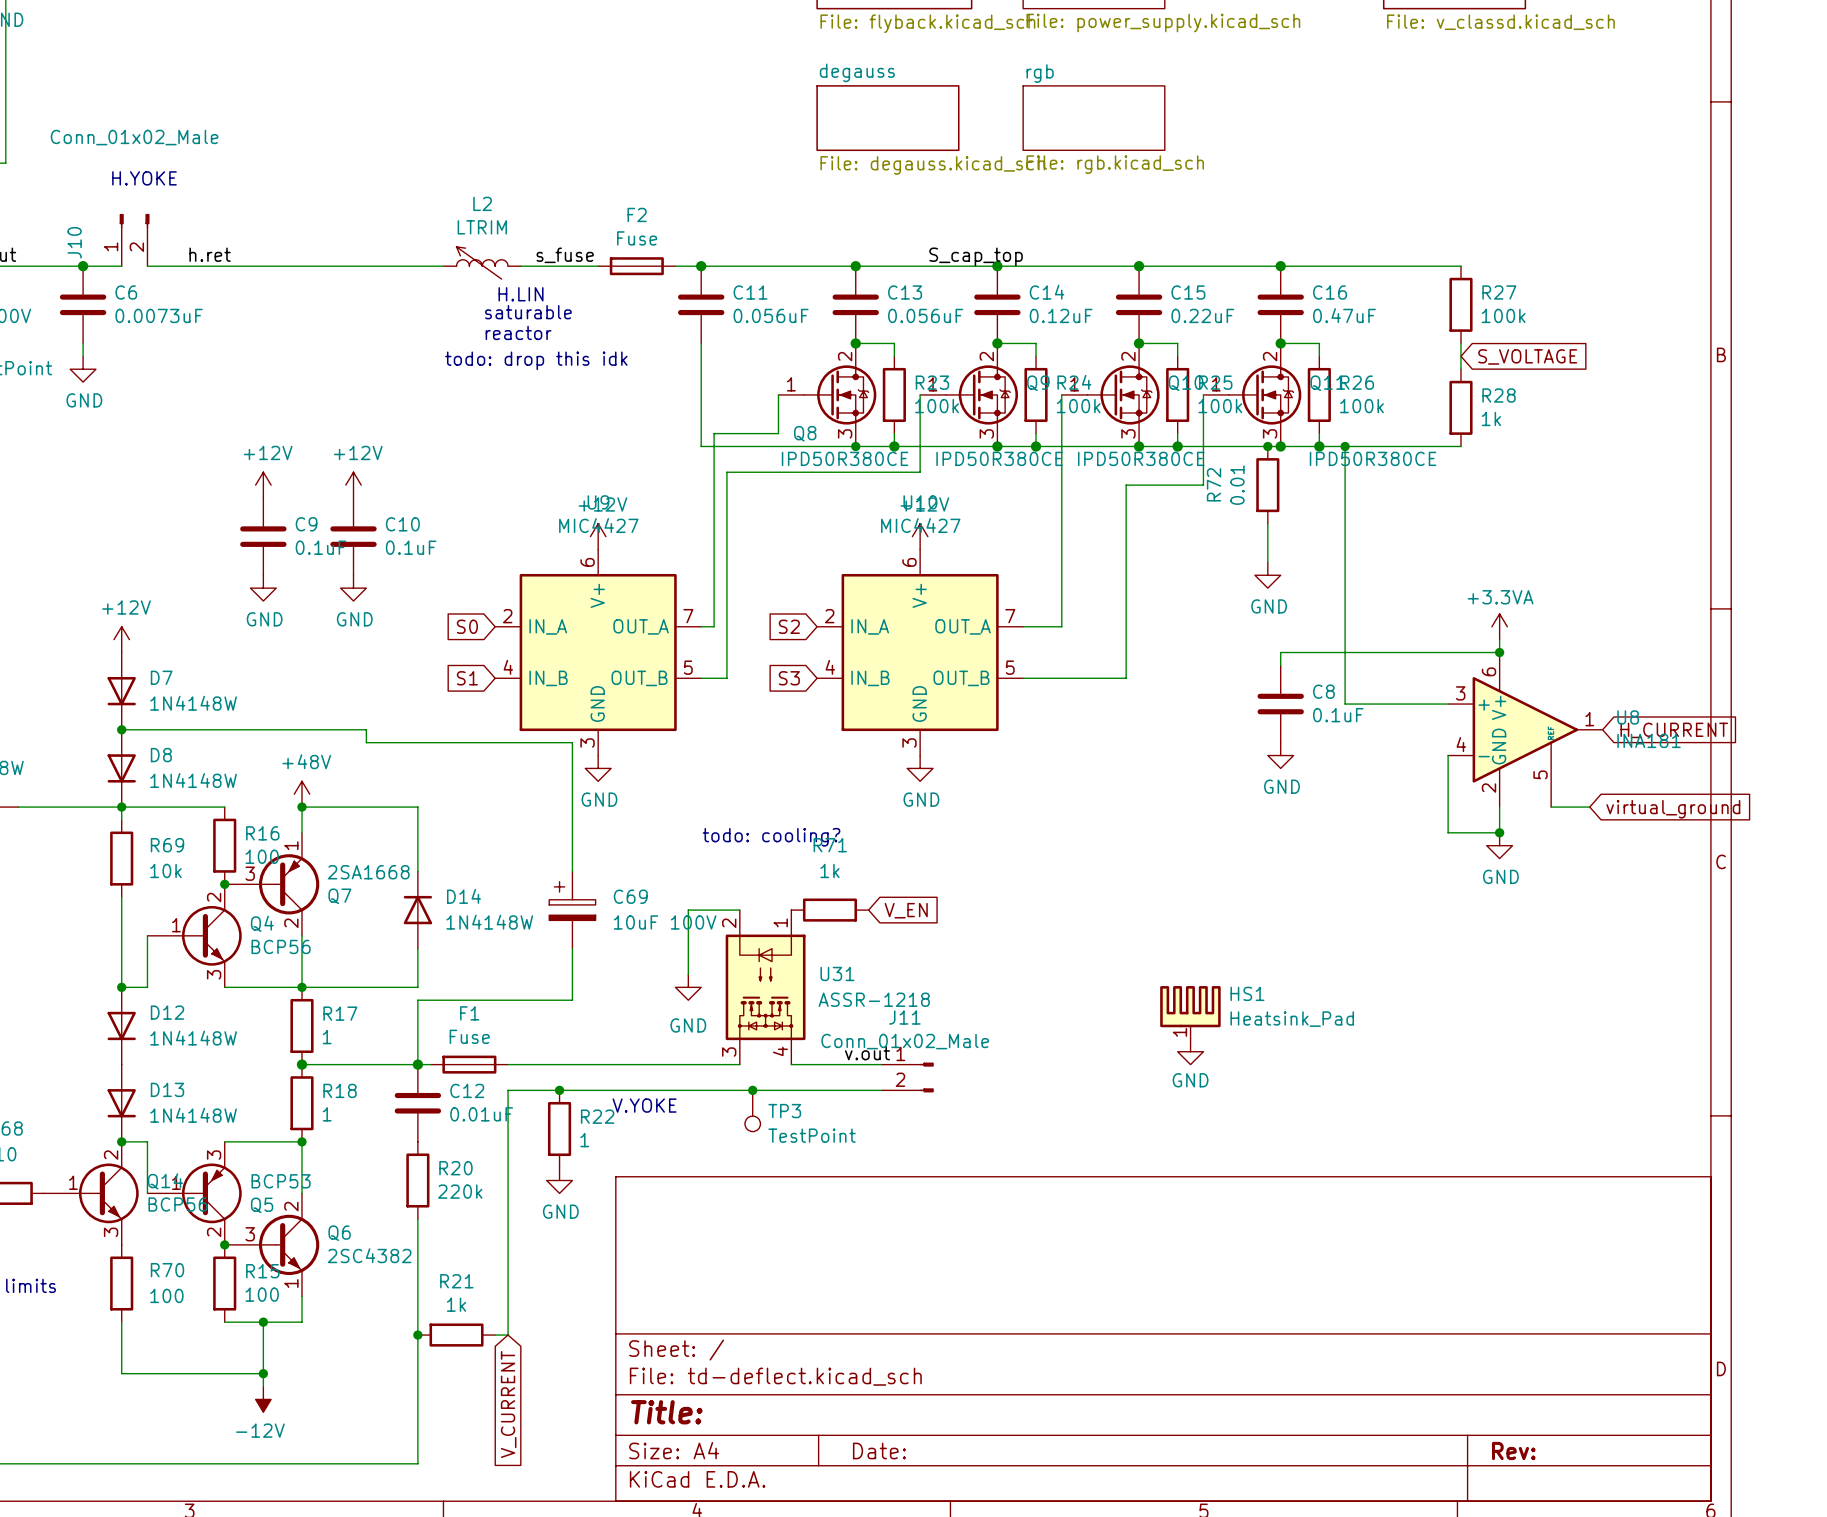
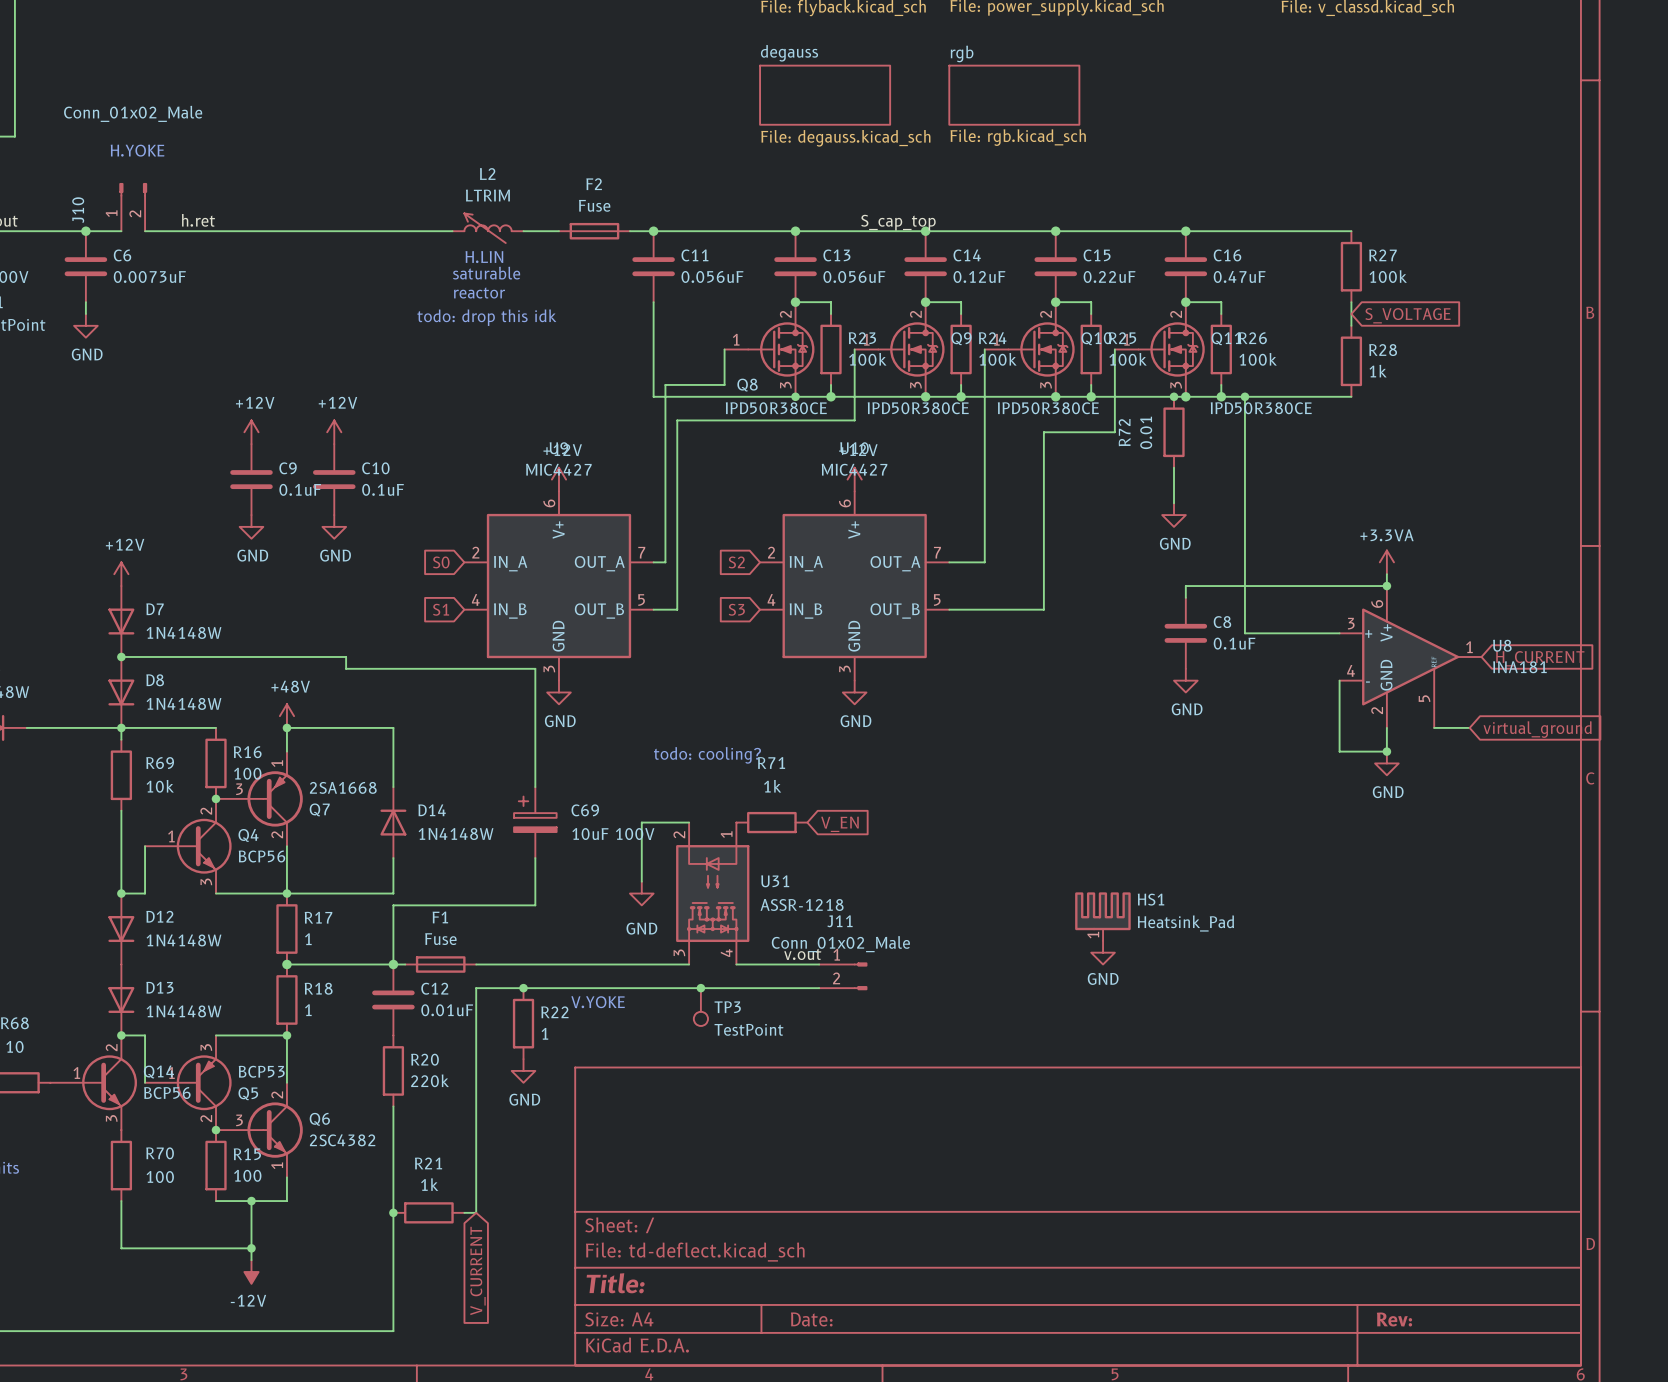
label: s_fuse (565, 255) -> none
L2 position: (482, 262) -> (488, 228)
wire: (520, 266) (559, 266) -> (417, 231) (452, 231)

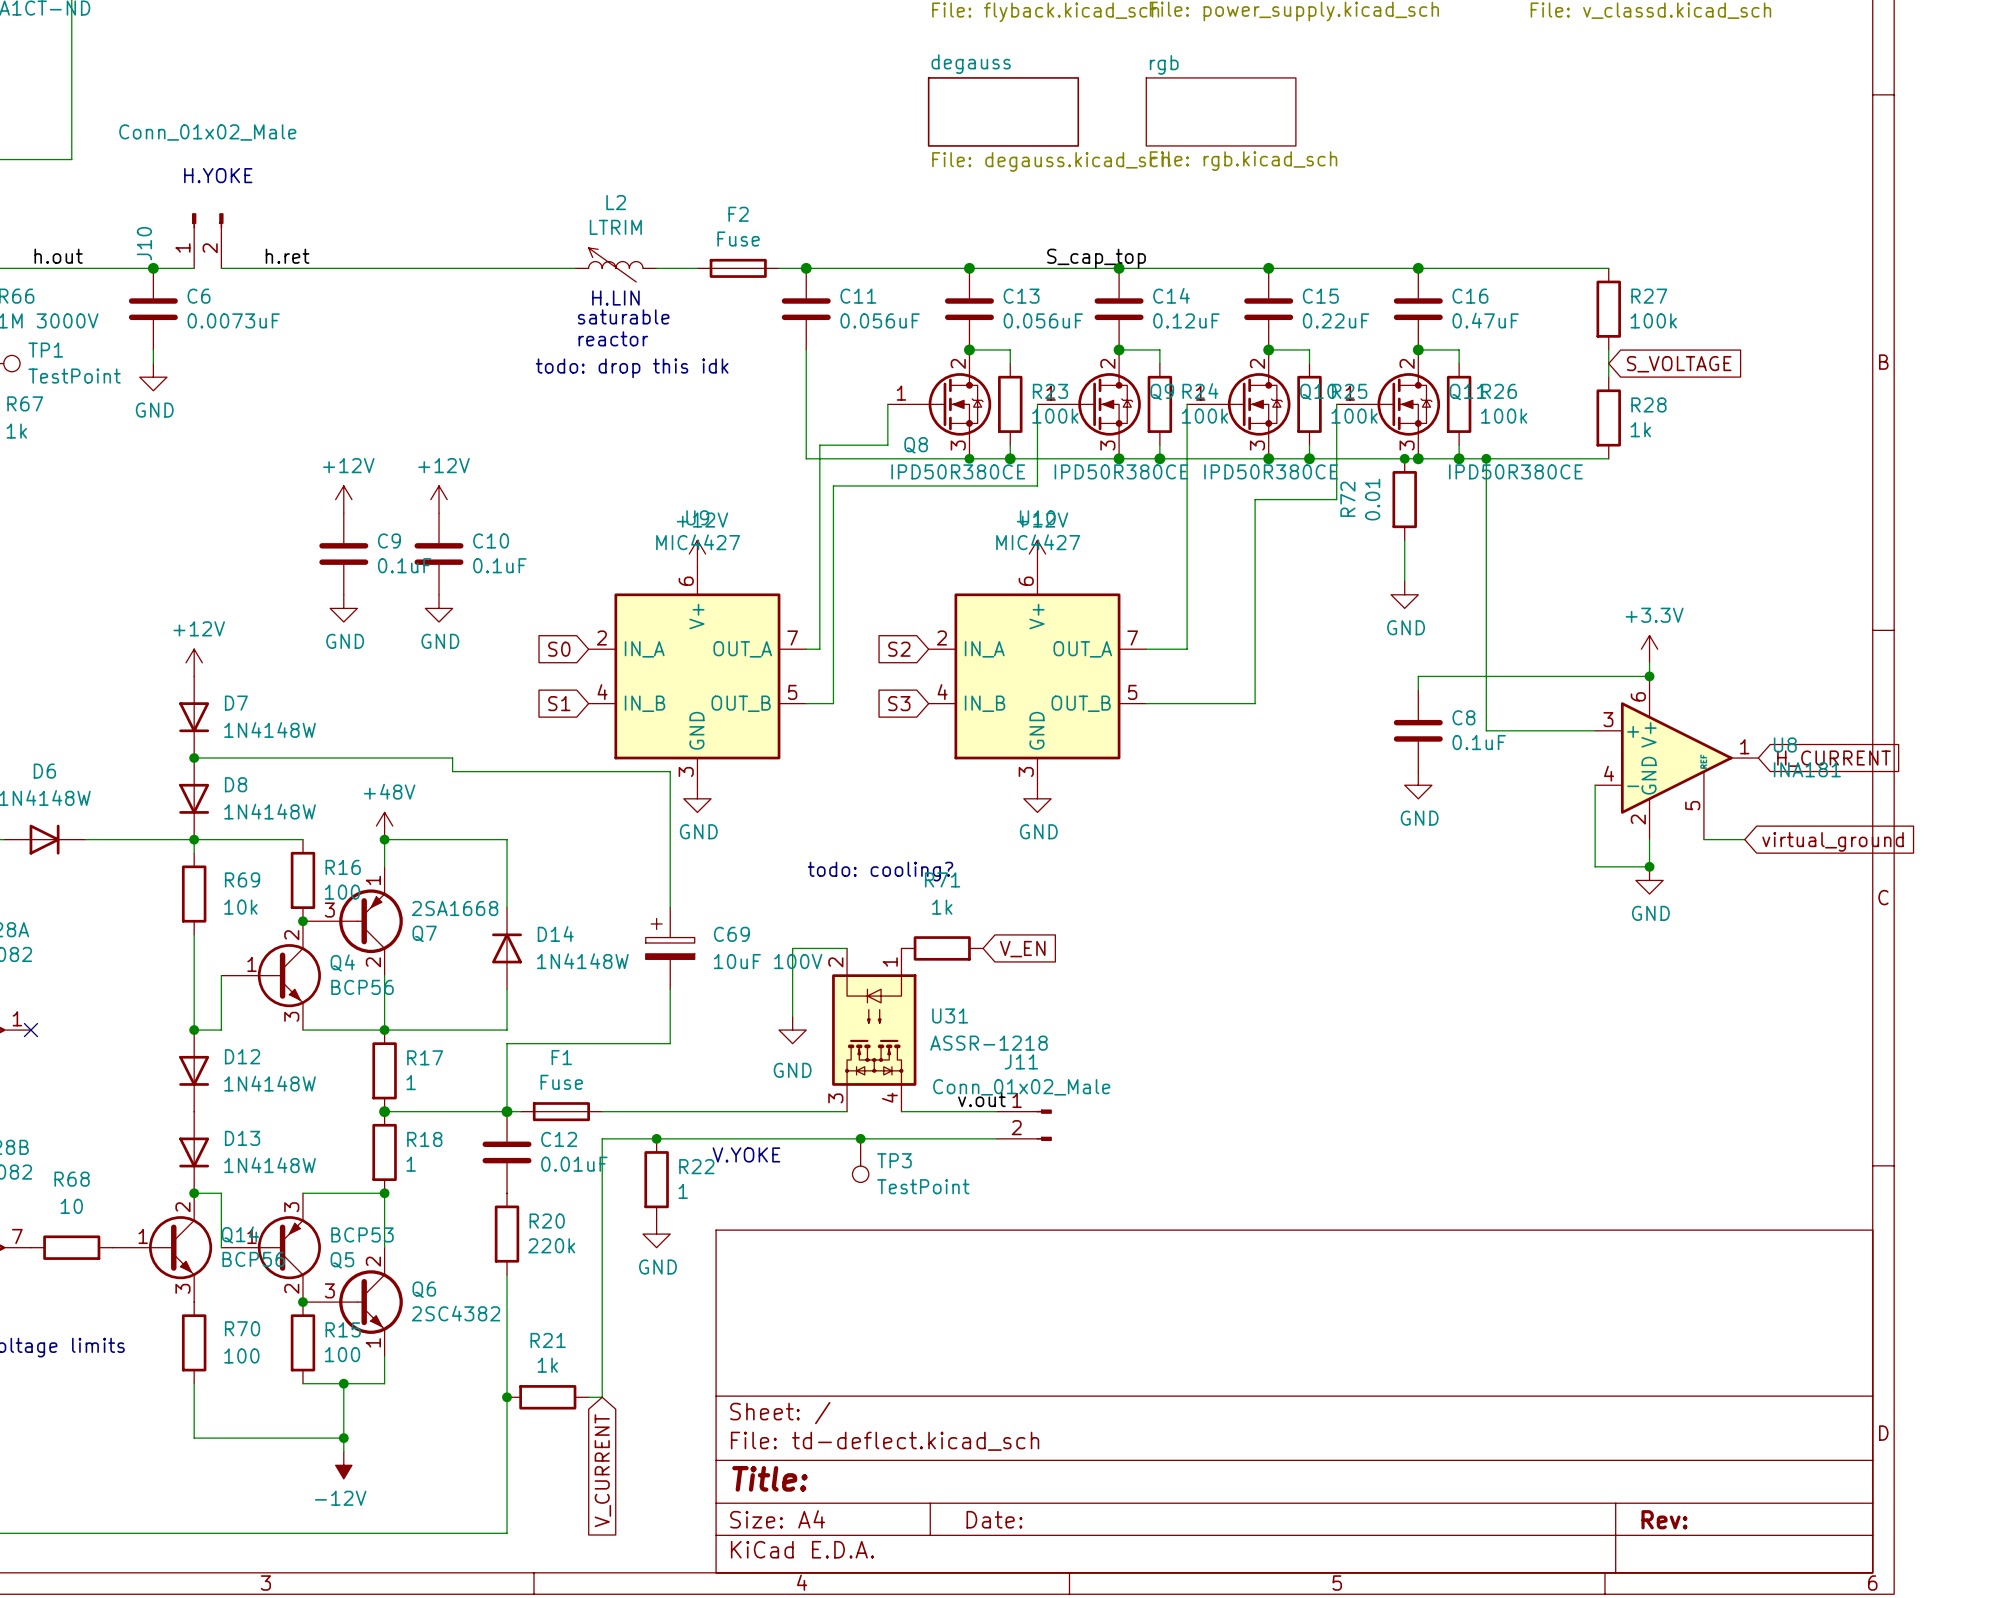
power symbol: +3.3VA (1386, 562) -> +3.3V (1649, 649)
HS1: Heatsink_Pad (1102, 916) -> none
power symbol: GND (1103, 952) -> none

